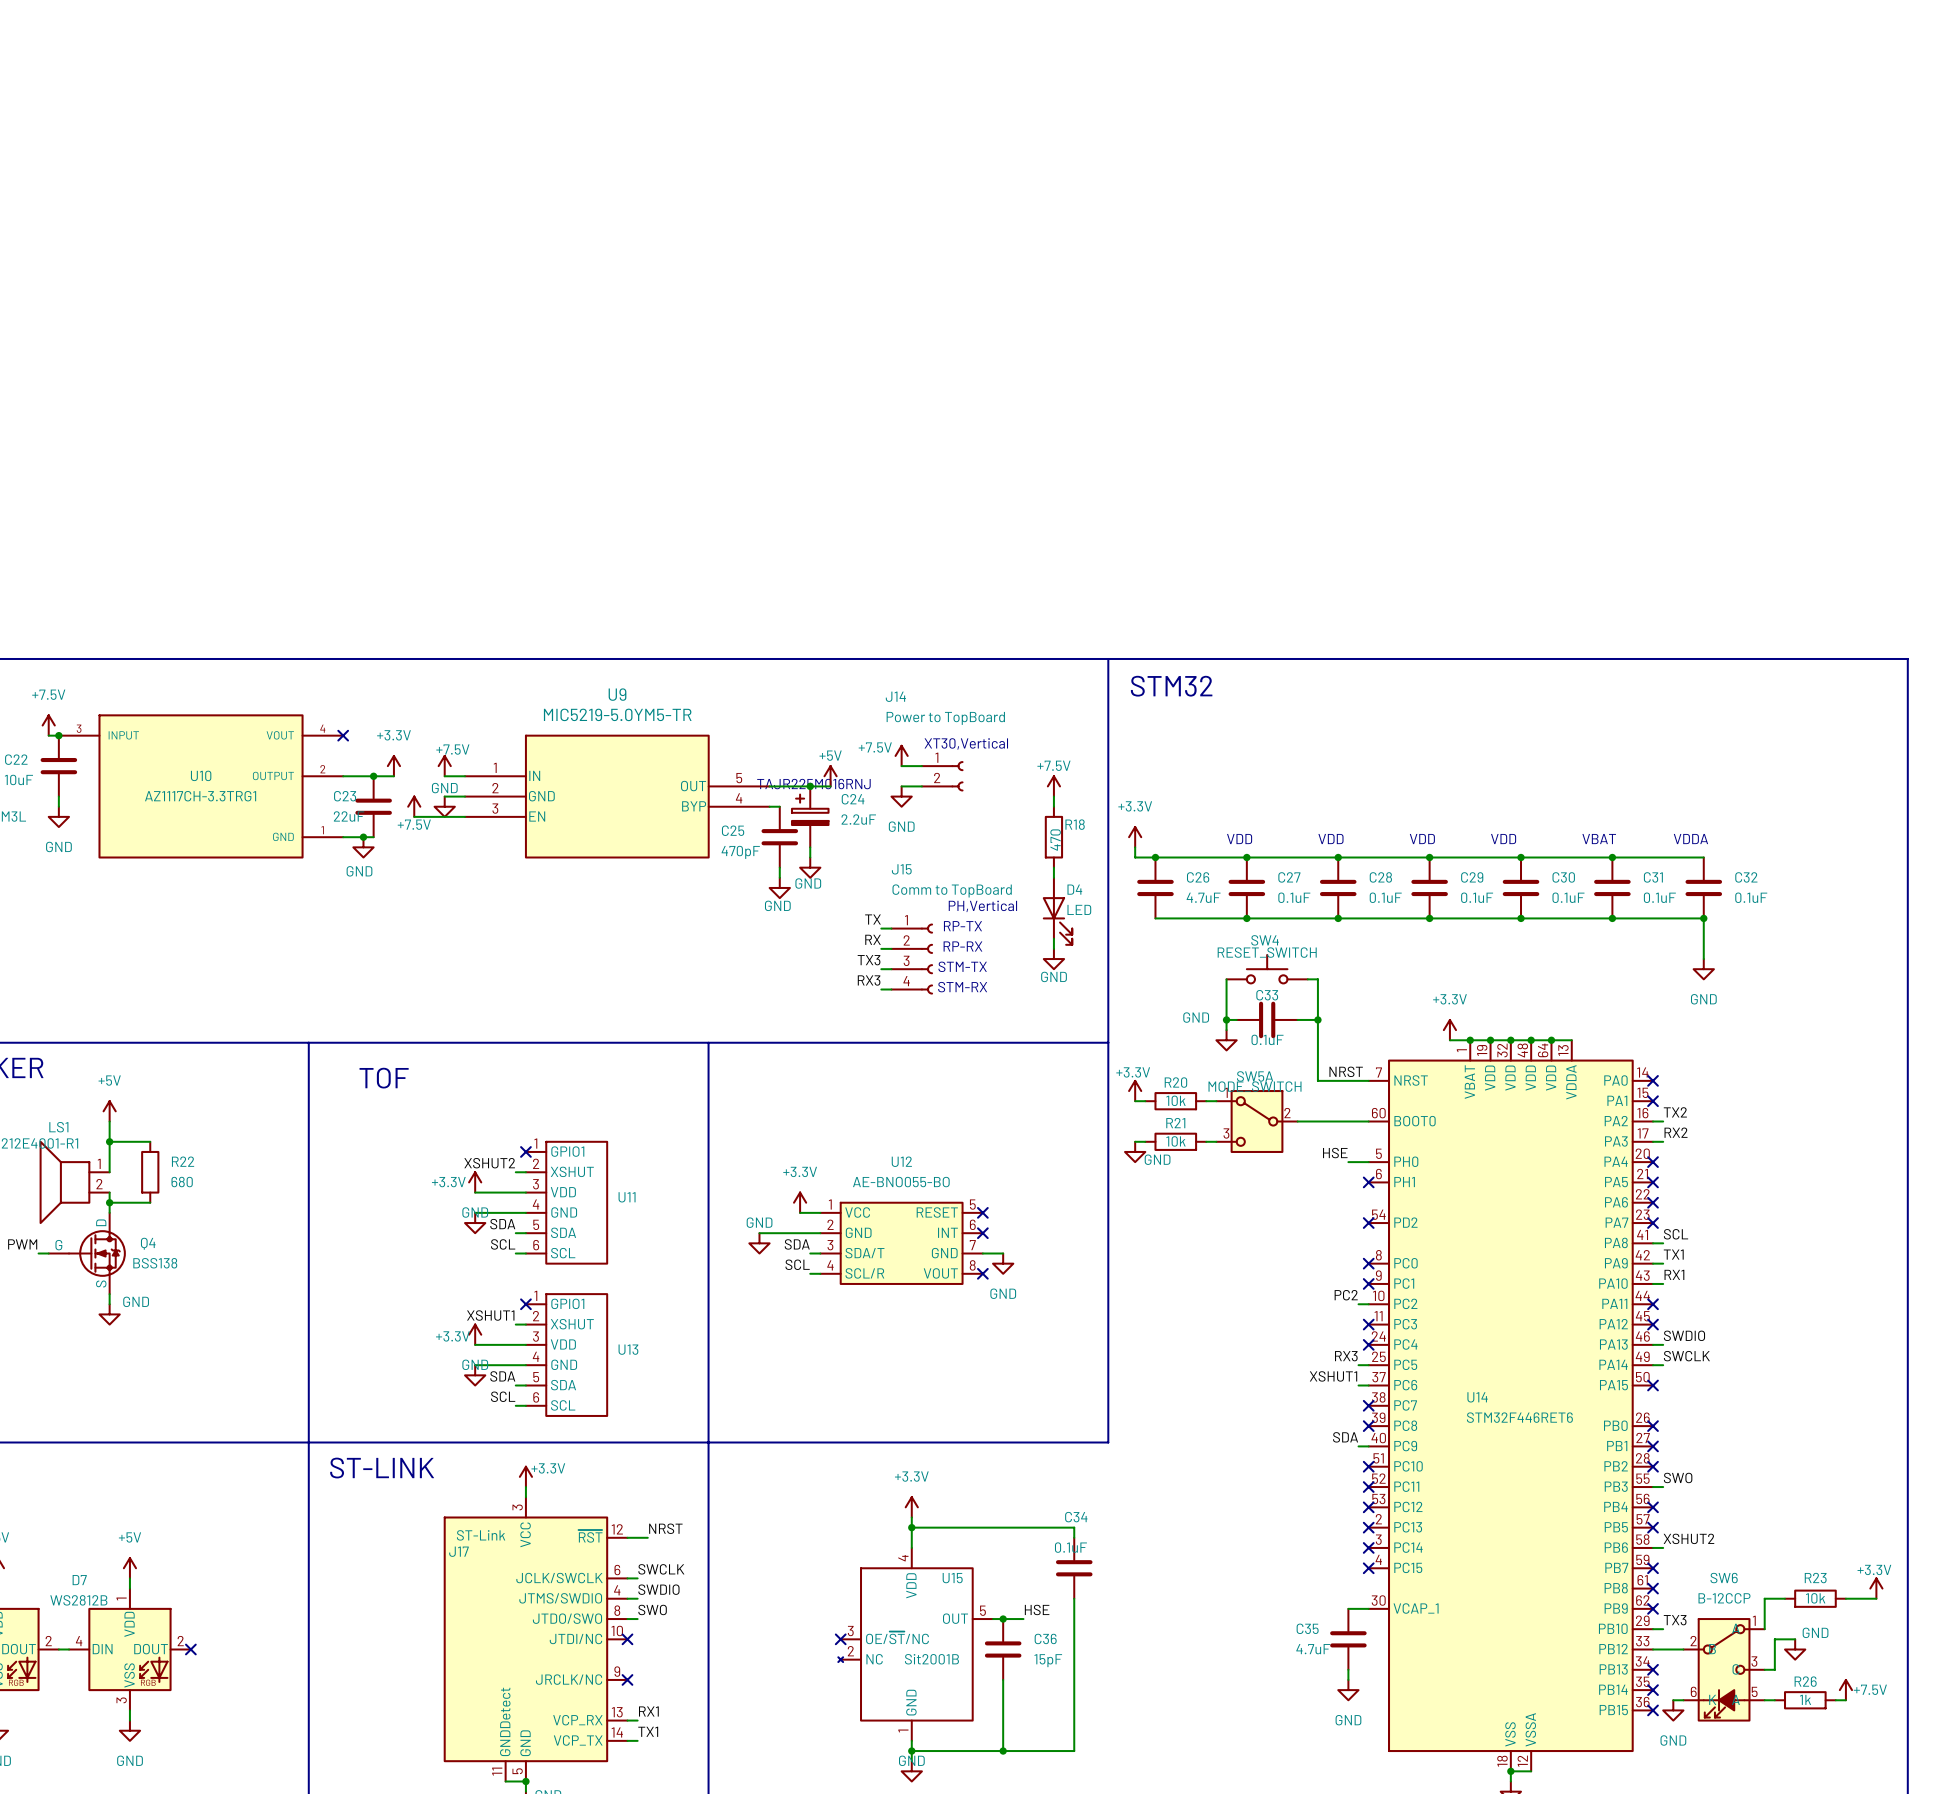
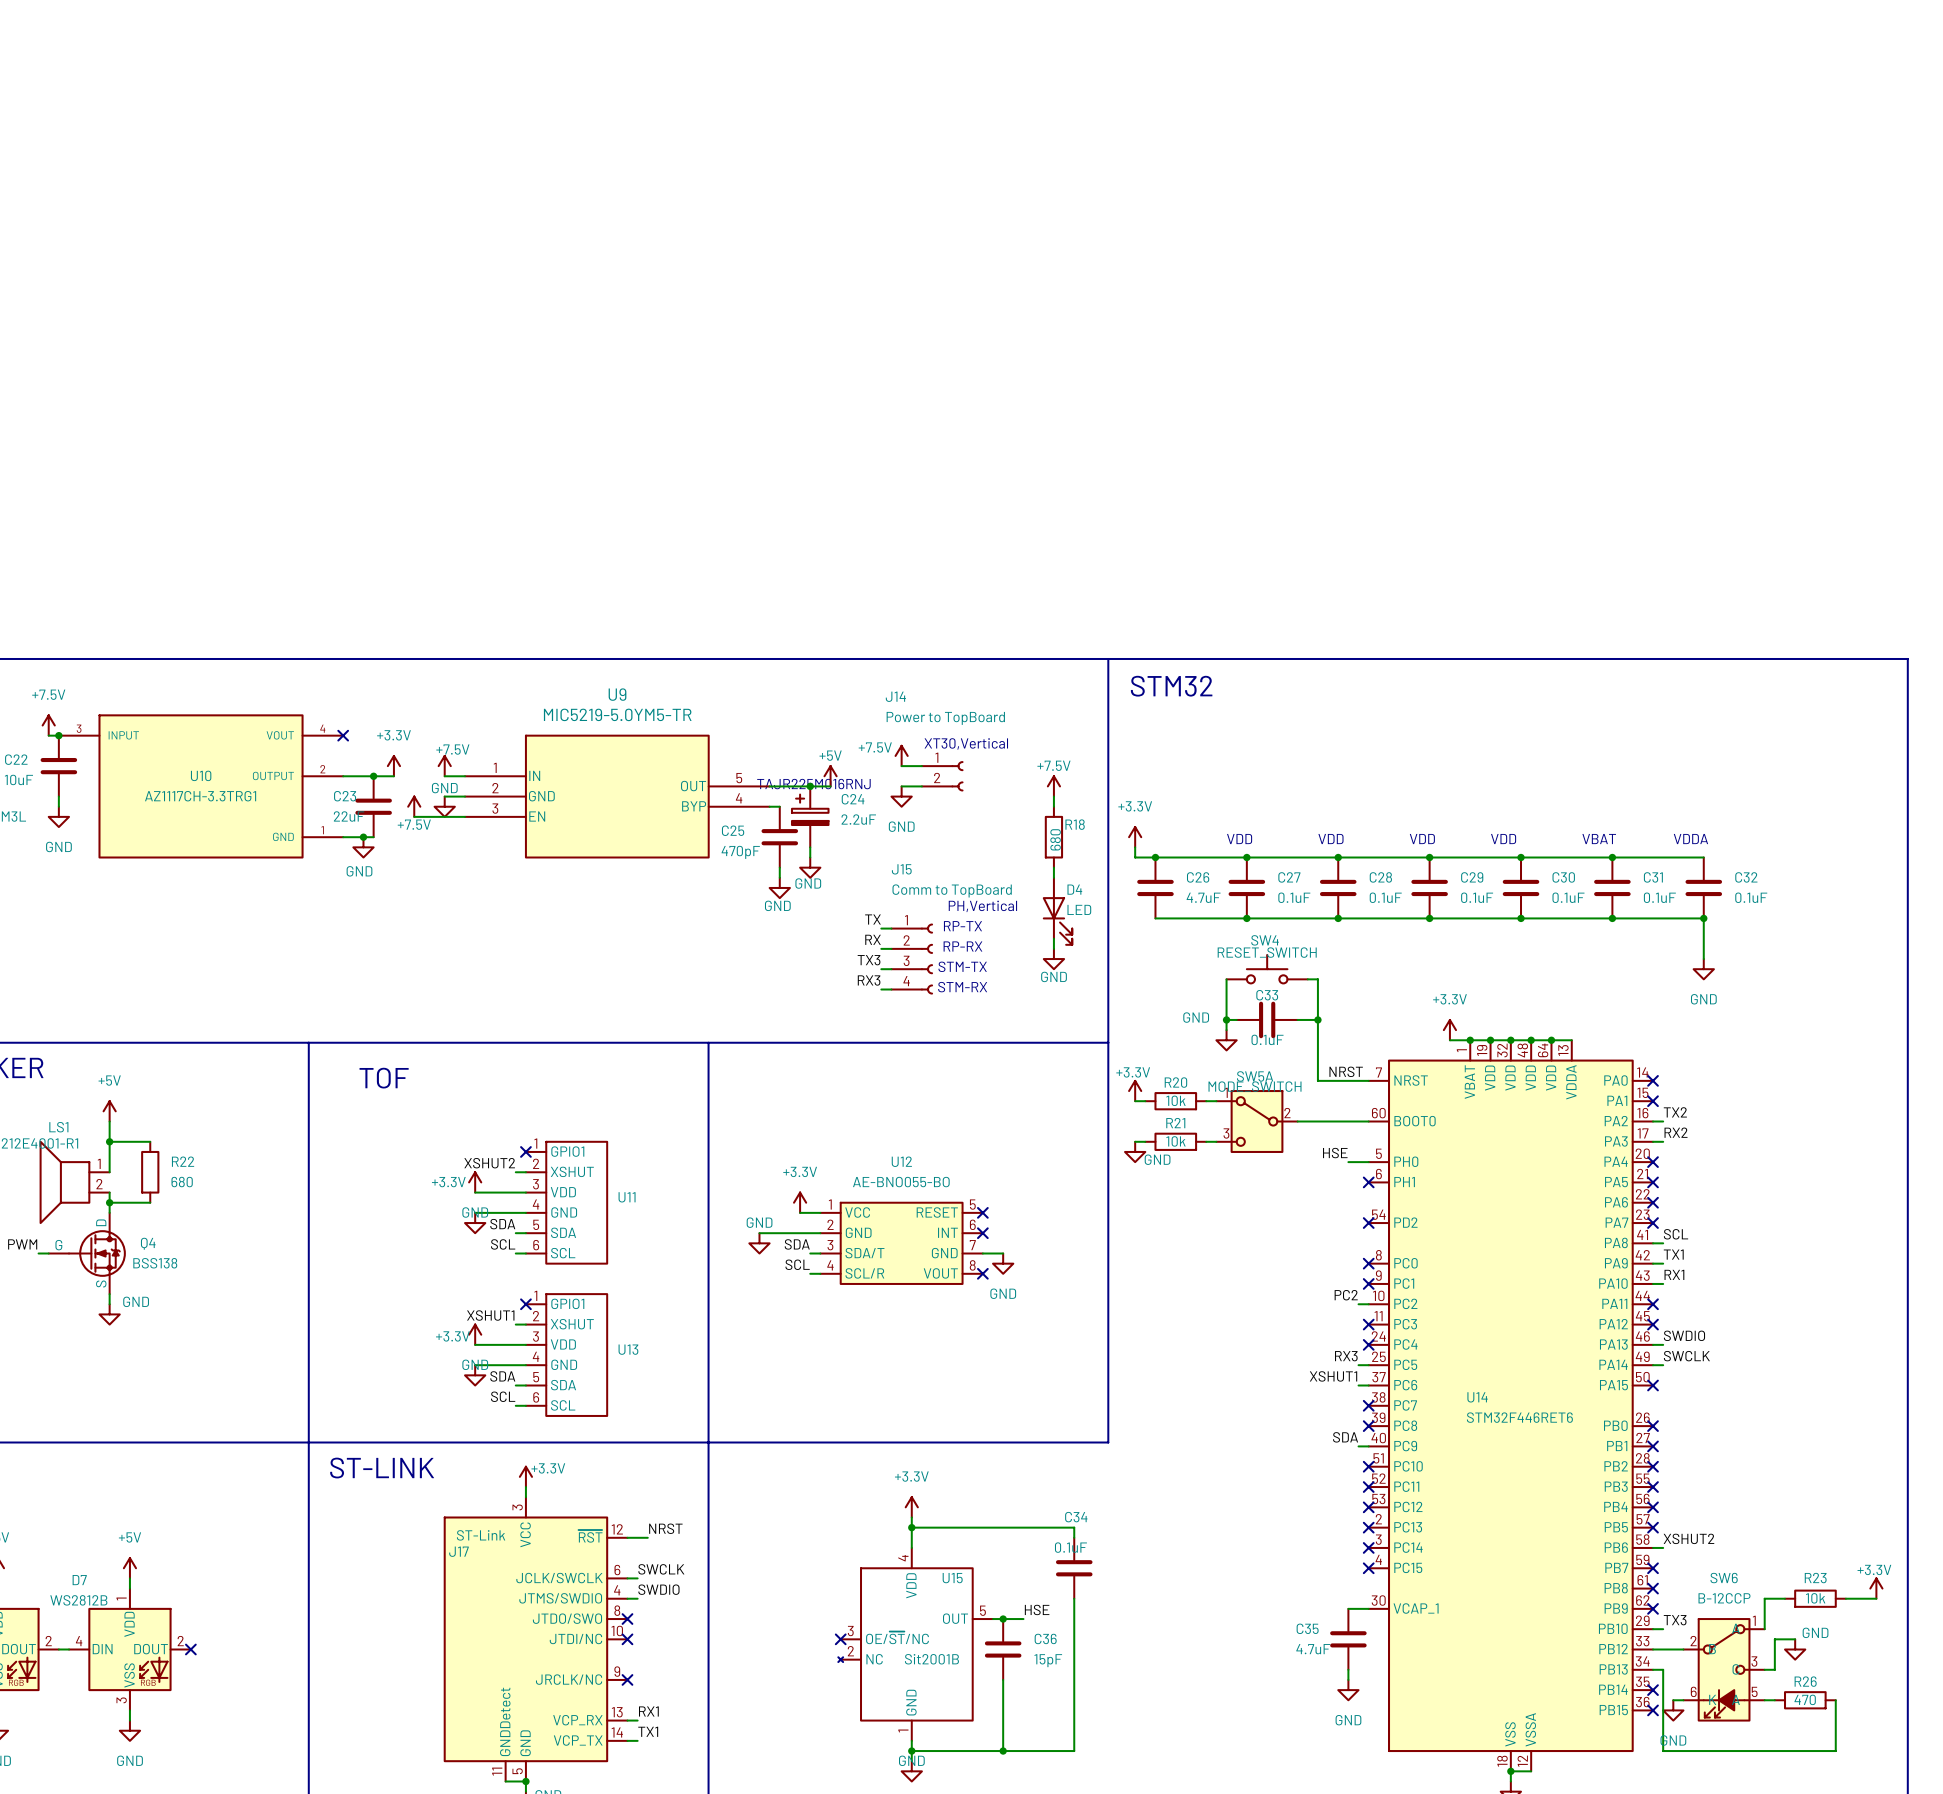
R18 value: 470 (1055, 840) -> 680 (1055, 839)
label: SWO (1678, 1477) -> none
wire: (1653, 1487) (1663, 1487) -> none
no-connect mark: none -> (1653, 1487)
label: SWO (652, 1609) -> none
wire: (627, 1619) (637, 1619) -> none
no-connect mark: none -> (627, 1619)
no-connect mark: (1653, 1669) -> none
power symbol: +7.5V (1845, 1690) -> none
R26 value: 1k (1805, 1699) -> 470 (1805, 1699)
wire: (1835, 1700) (1845, 1700) -> (1835, 1700) (1835, 1751) (1663, 1751) (1663, 1669) (1653, 1669)

